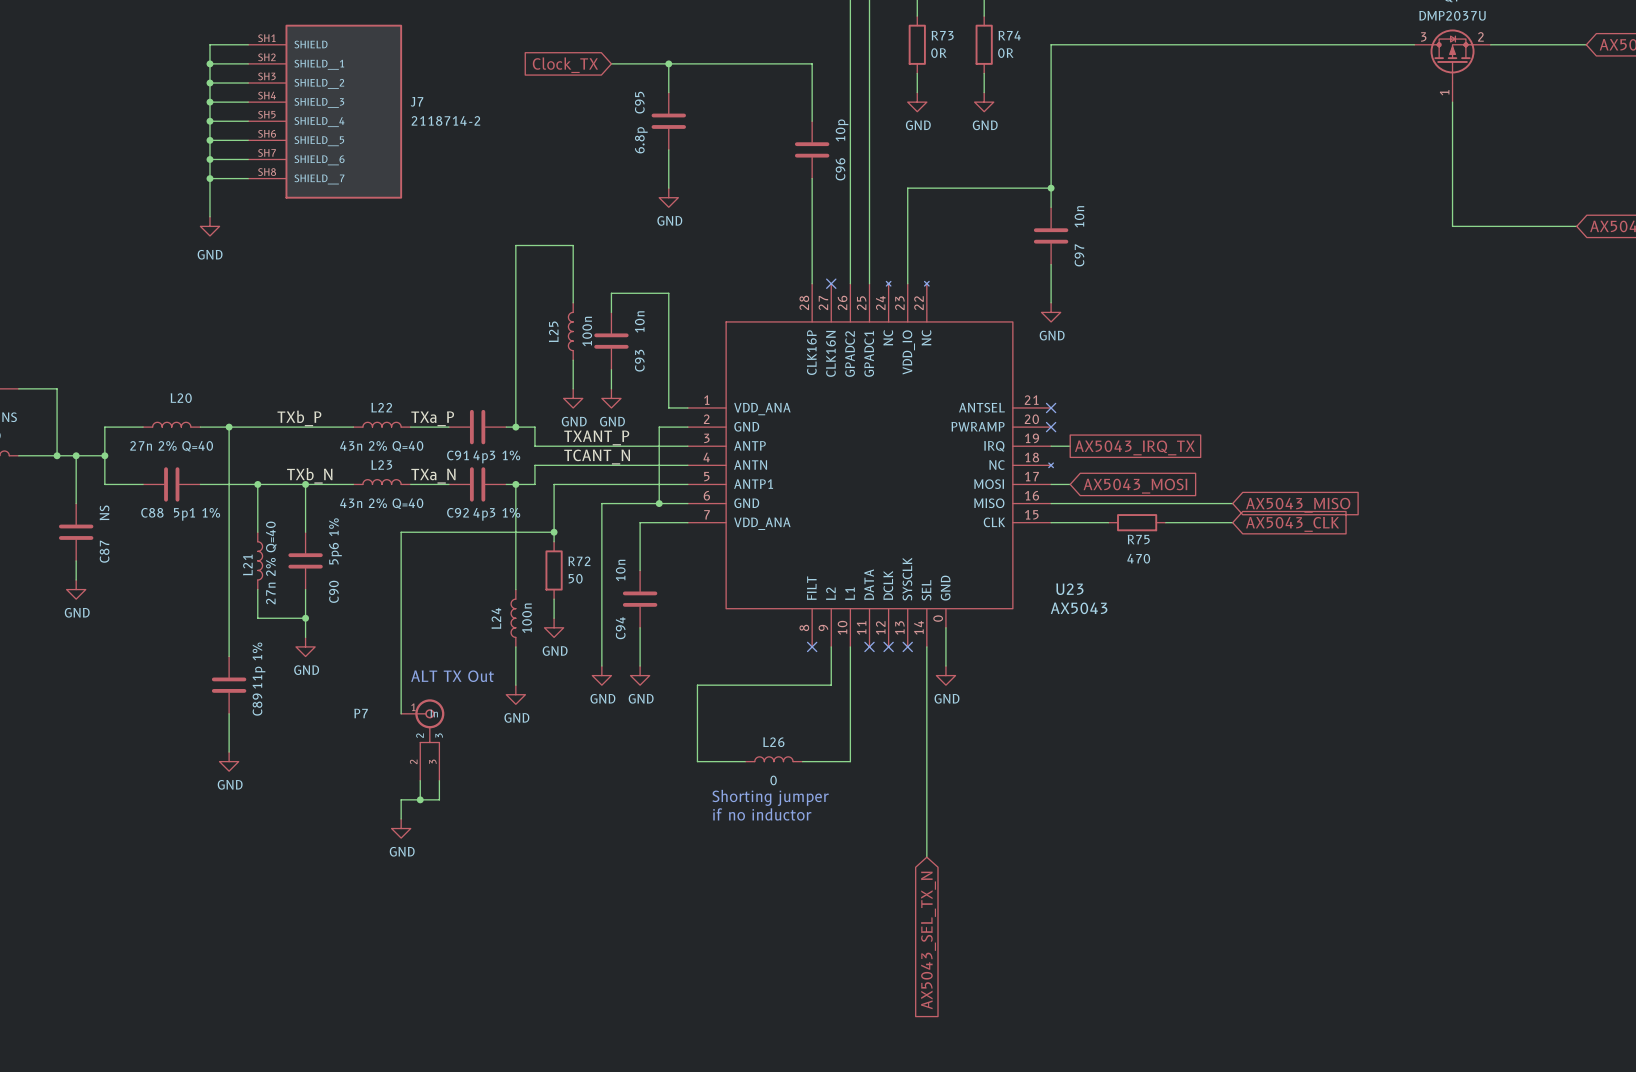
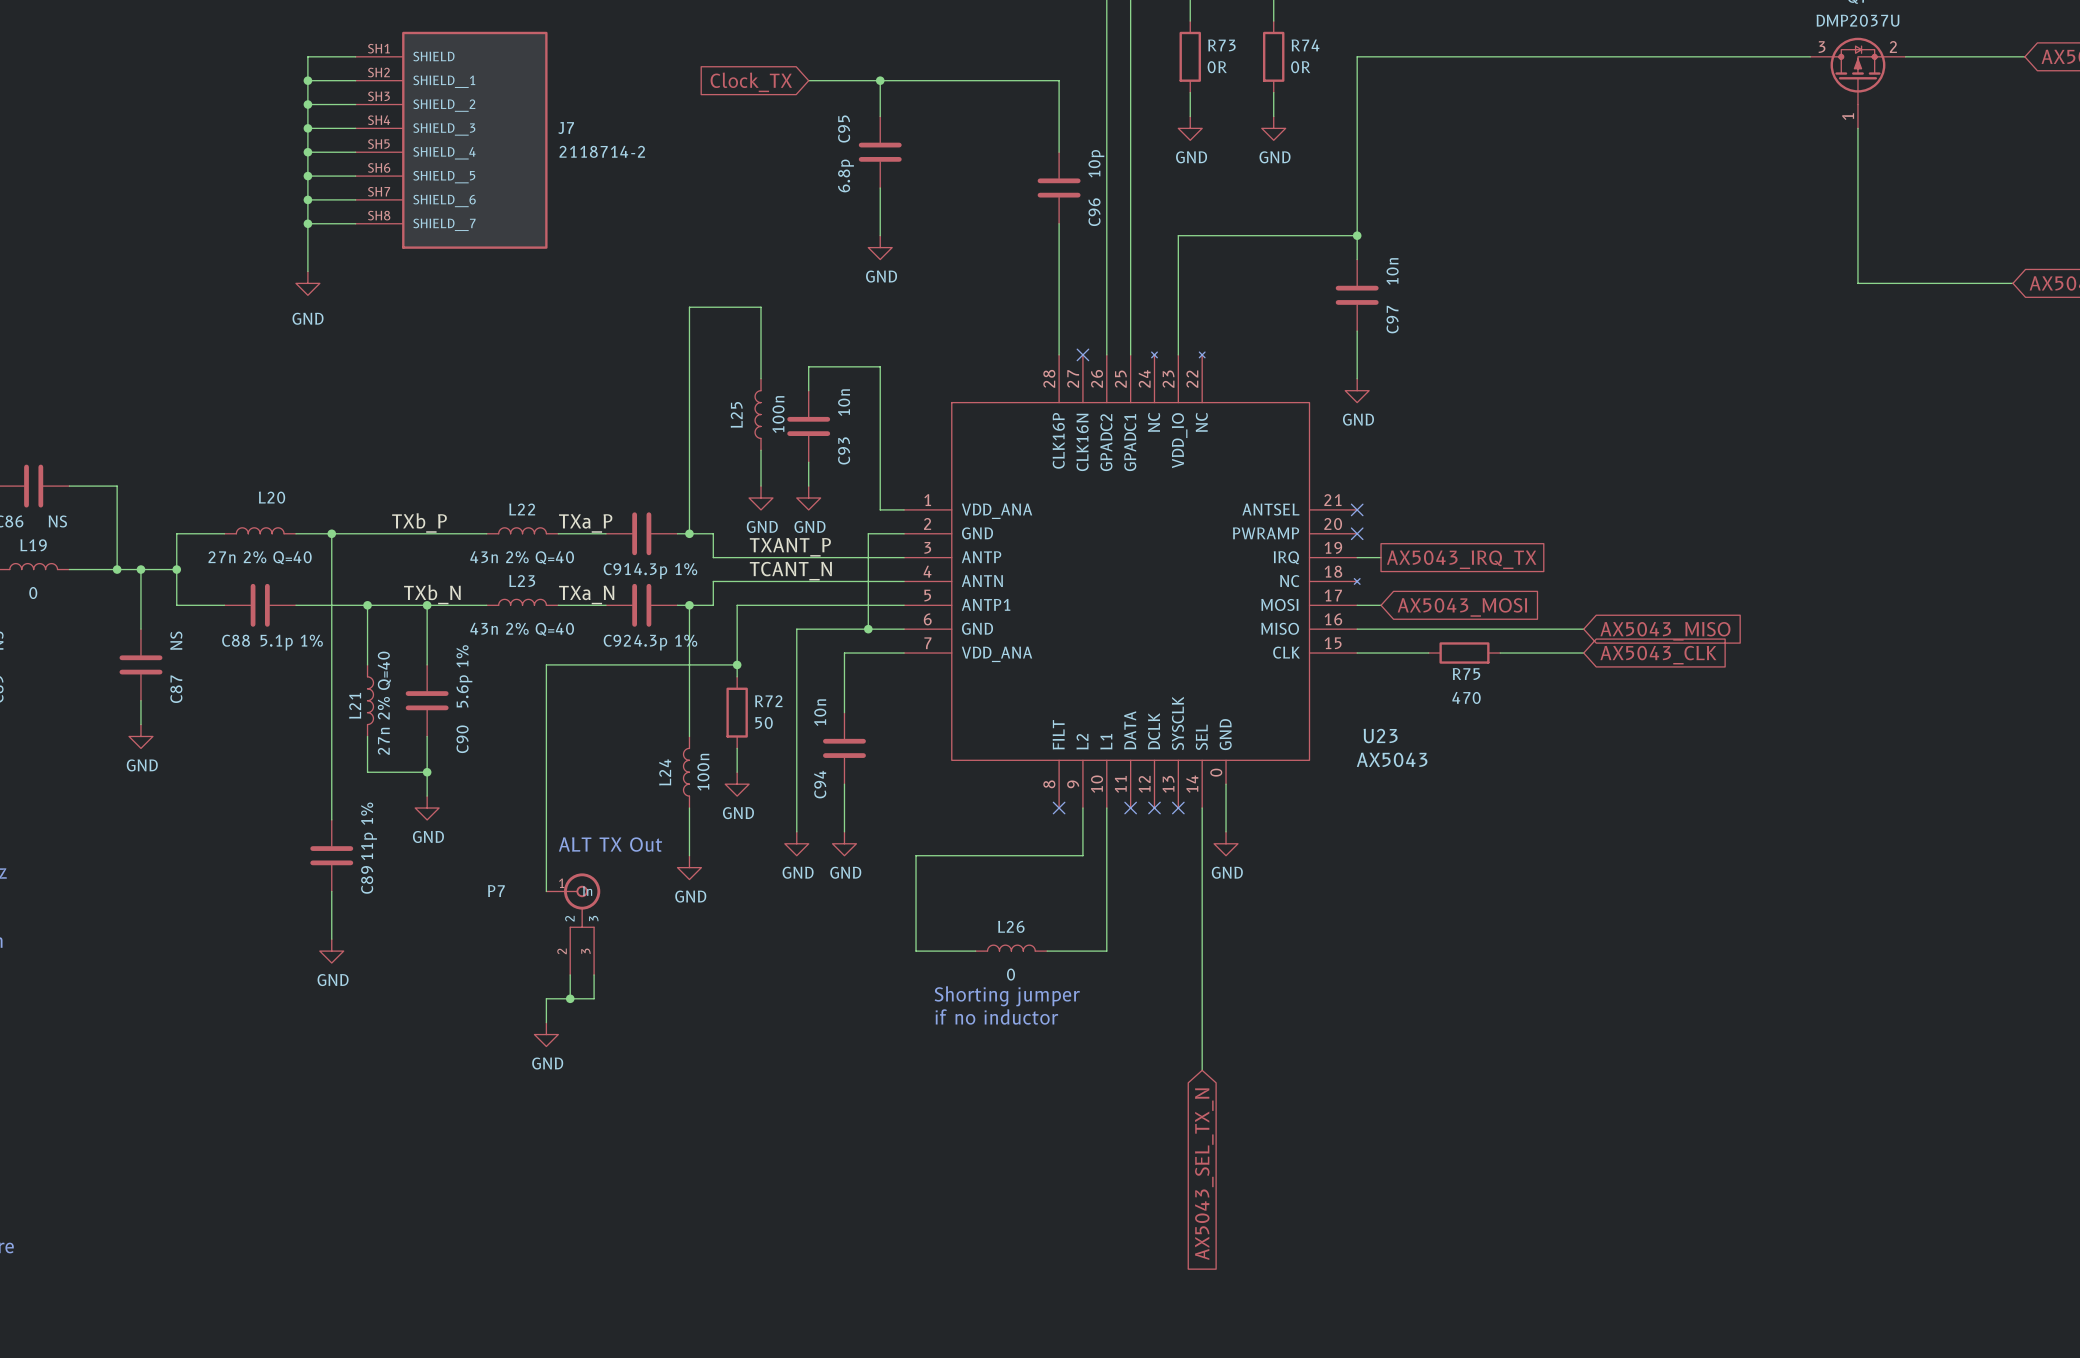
C91 value: 4p3 1% (496, 456) -> 4.3p 1% (665, 571)
C88 value: 5p1 1% (197, 514) -> 5.1p 1% (291, 642)
C92 value: 4p3 1% (496, 514) -> 4.3p 1% (665, 642)
C90 value: 5p6 1% (335, 541) -> 5.6p 1% (464, 676)

